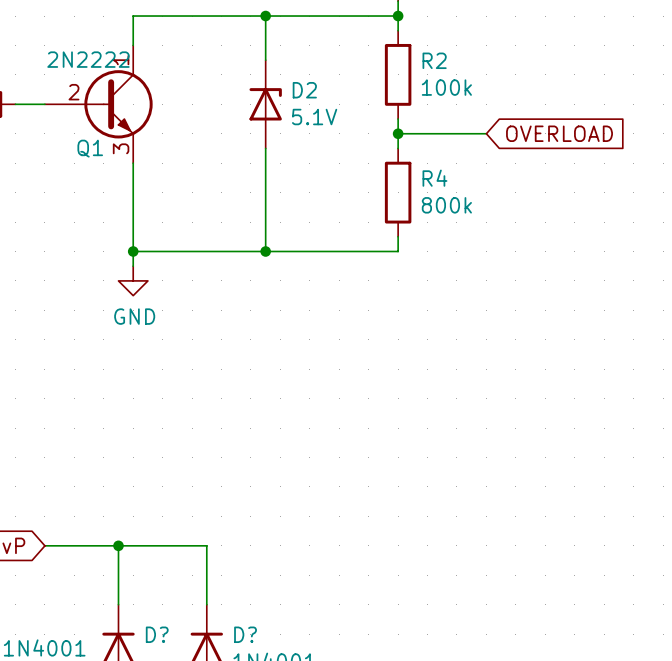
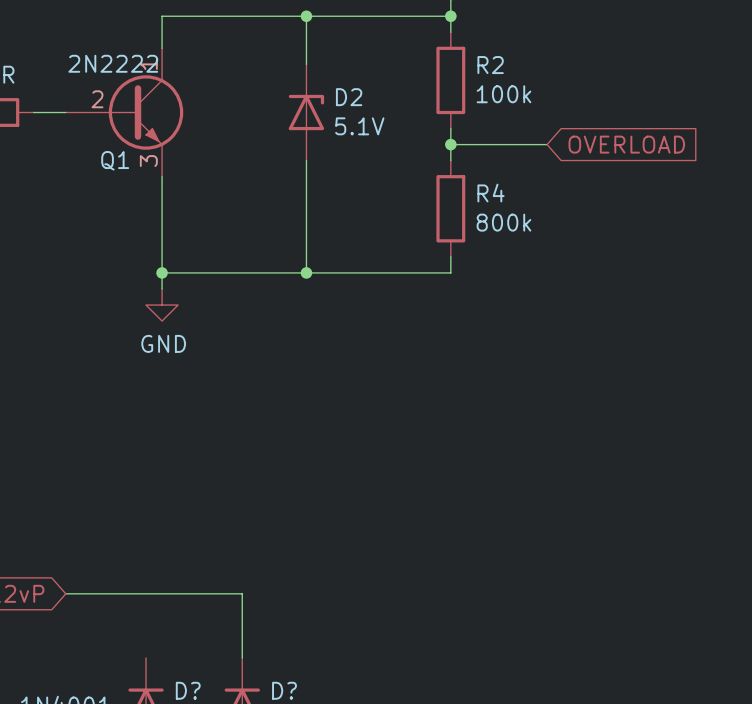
wire: (118, 545) (118, 604) -> none
junction: (118, 545) -> none

